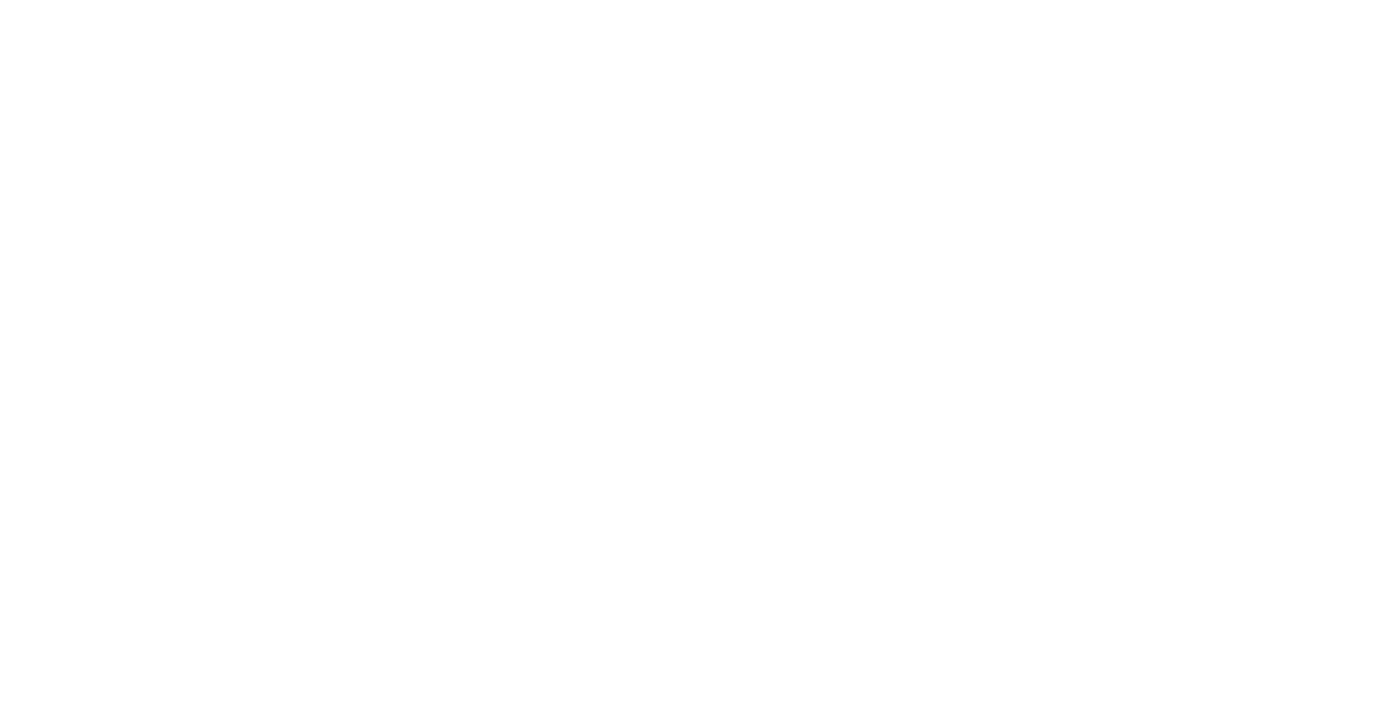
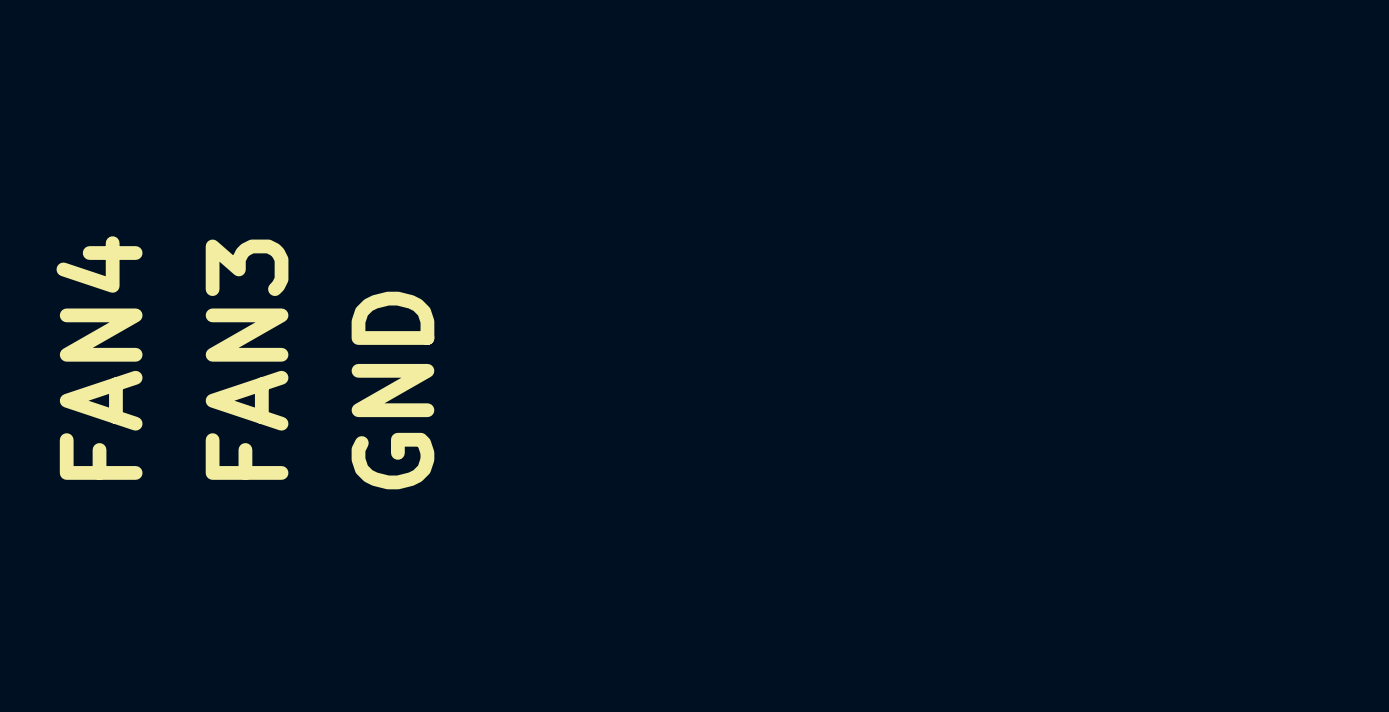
text: none -> FAN4 (99, 358)
text: none -> FAN3 (247, 359)
text: none -> GND (392, 390)

